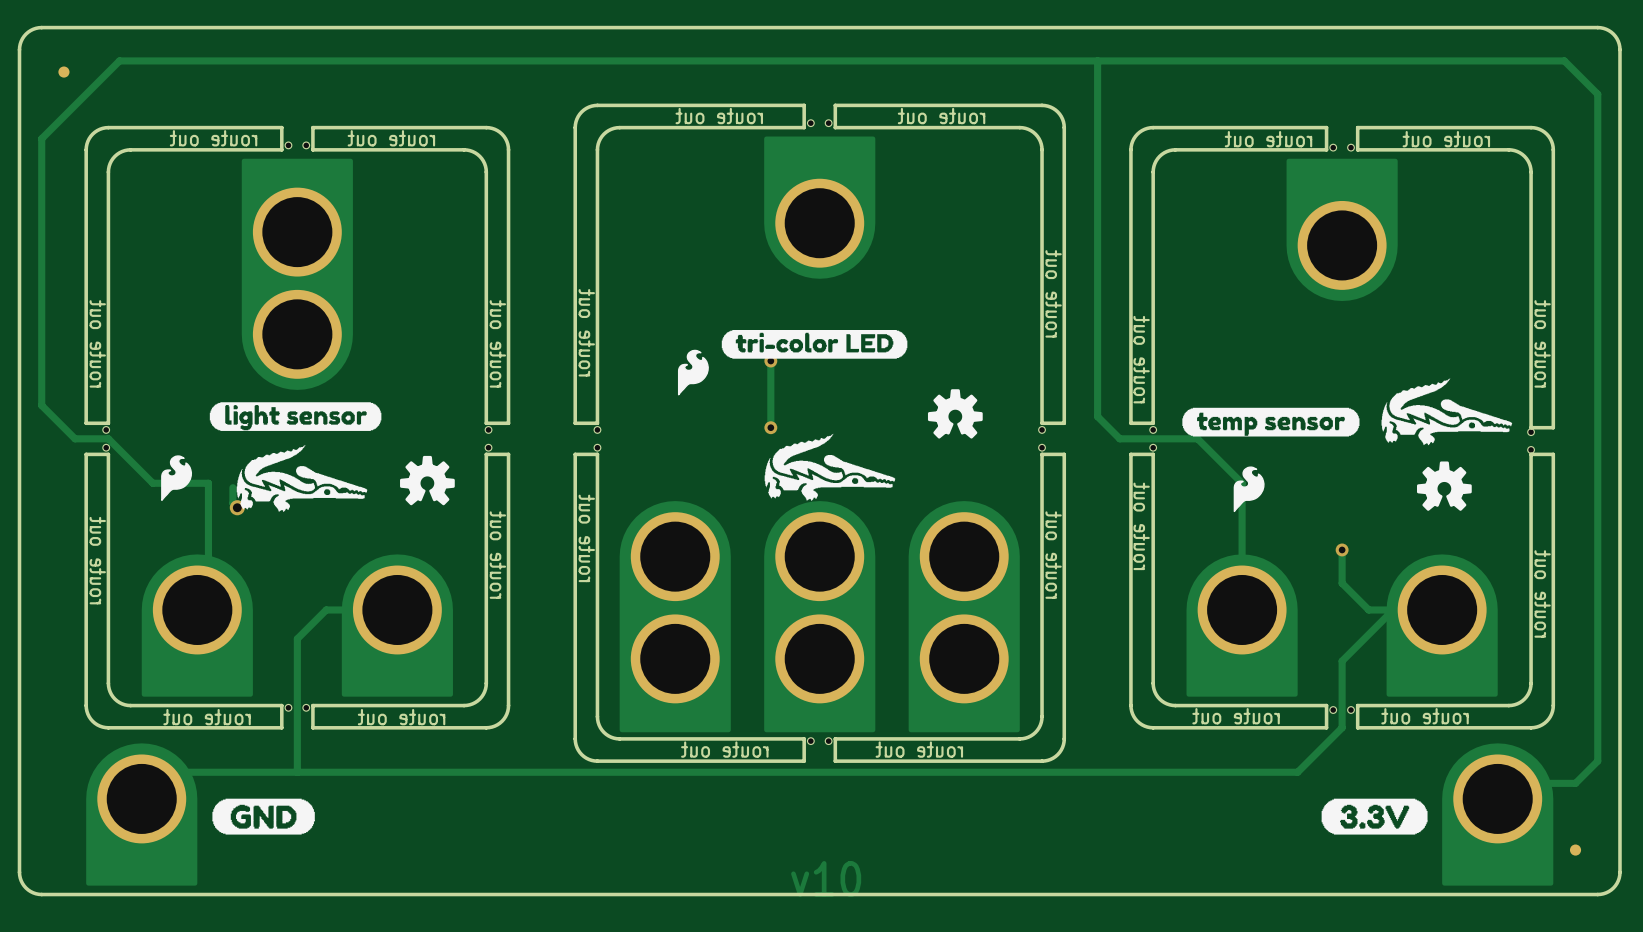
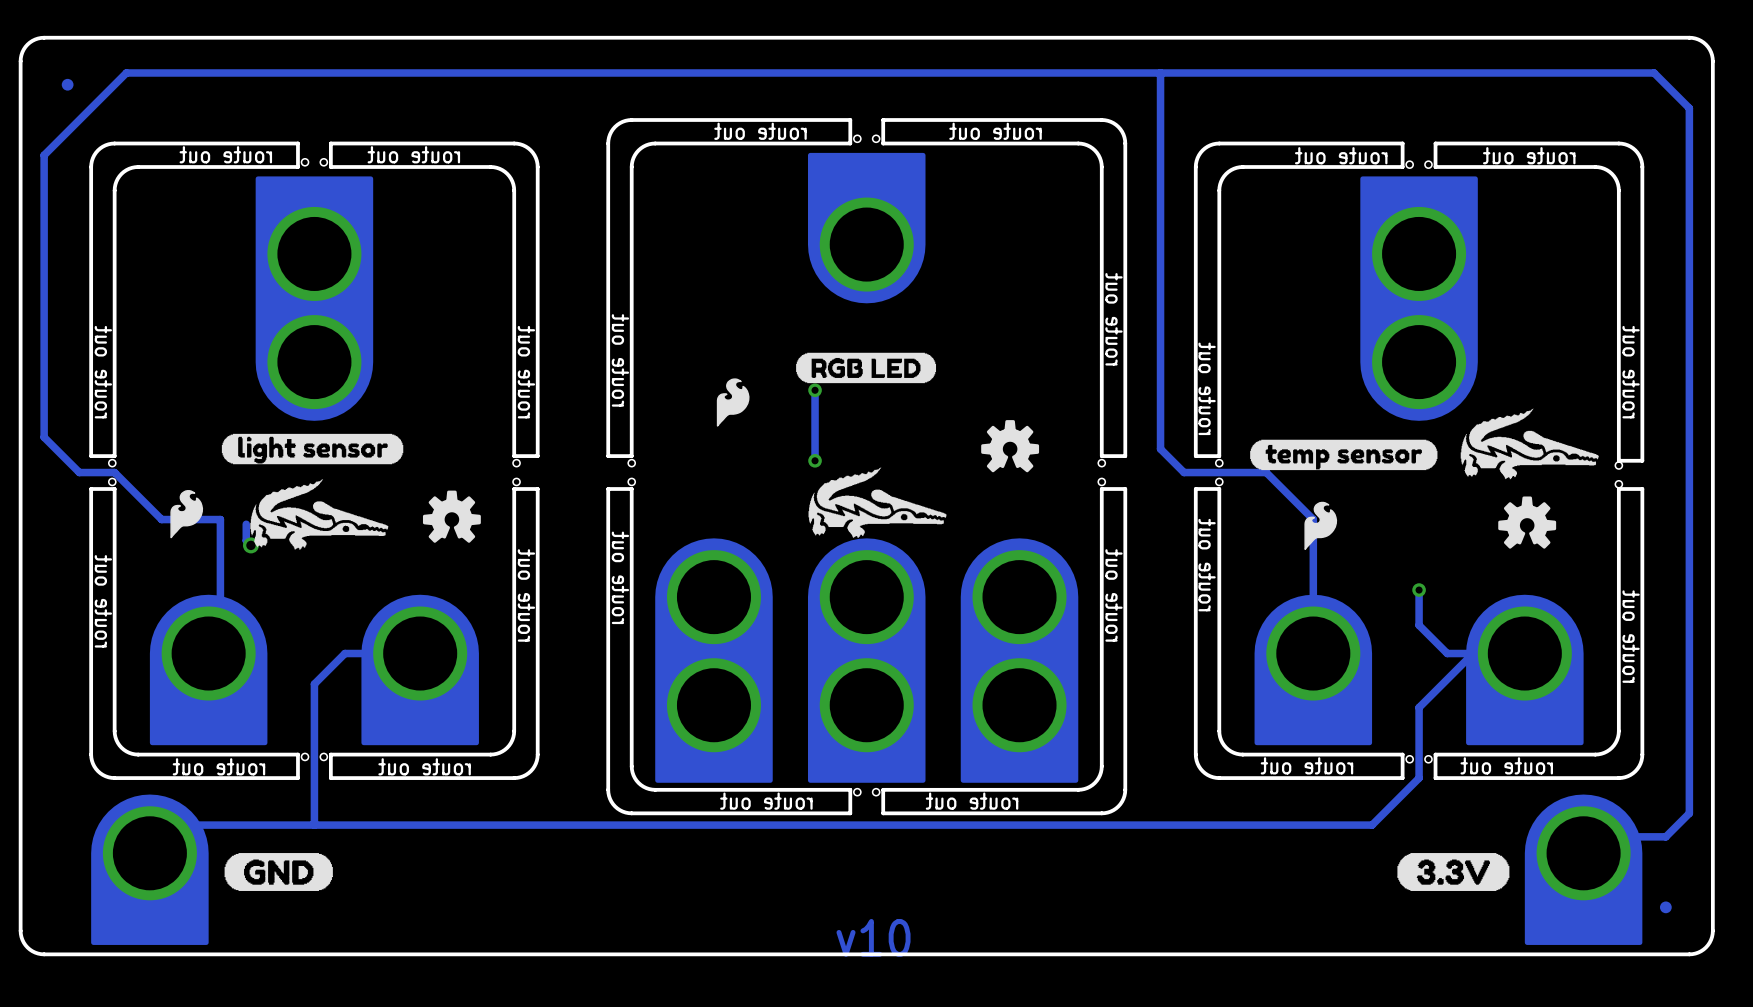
part: (1342, 229) -> none
part: none -> (1419, 298)
drawing shape: [721, 330, 908, 359] -> [796, 352, 937, 384]

